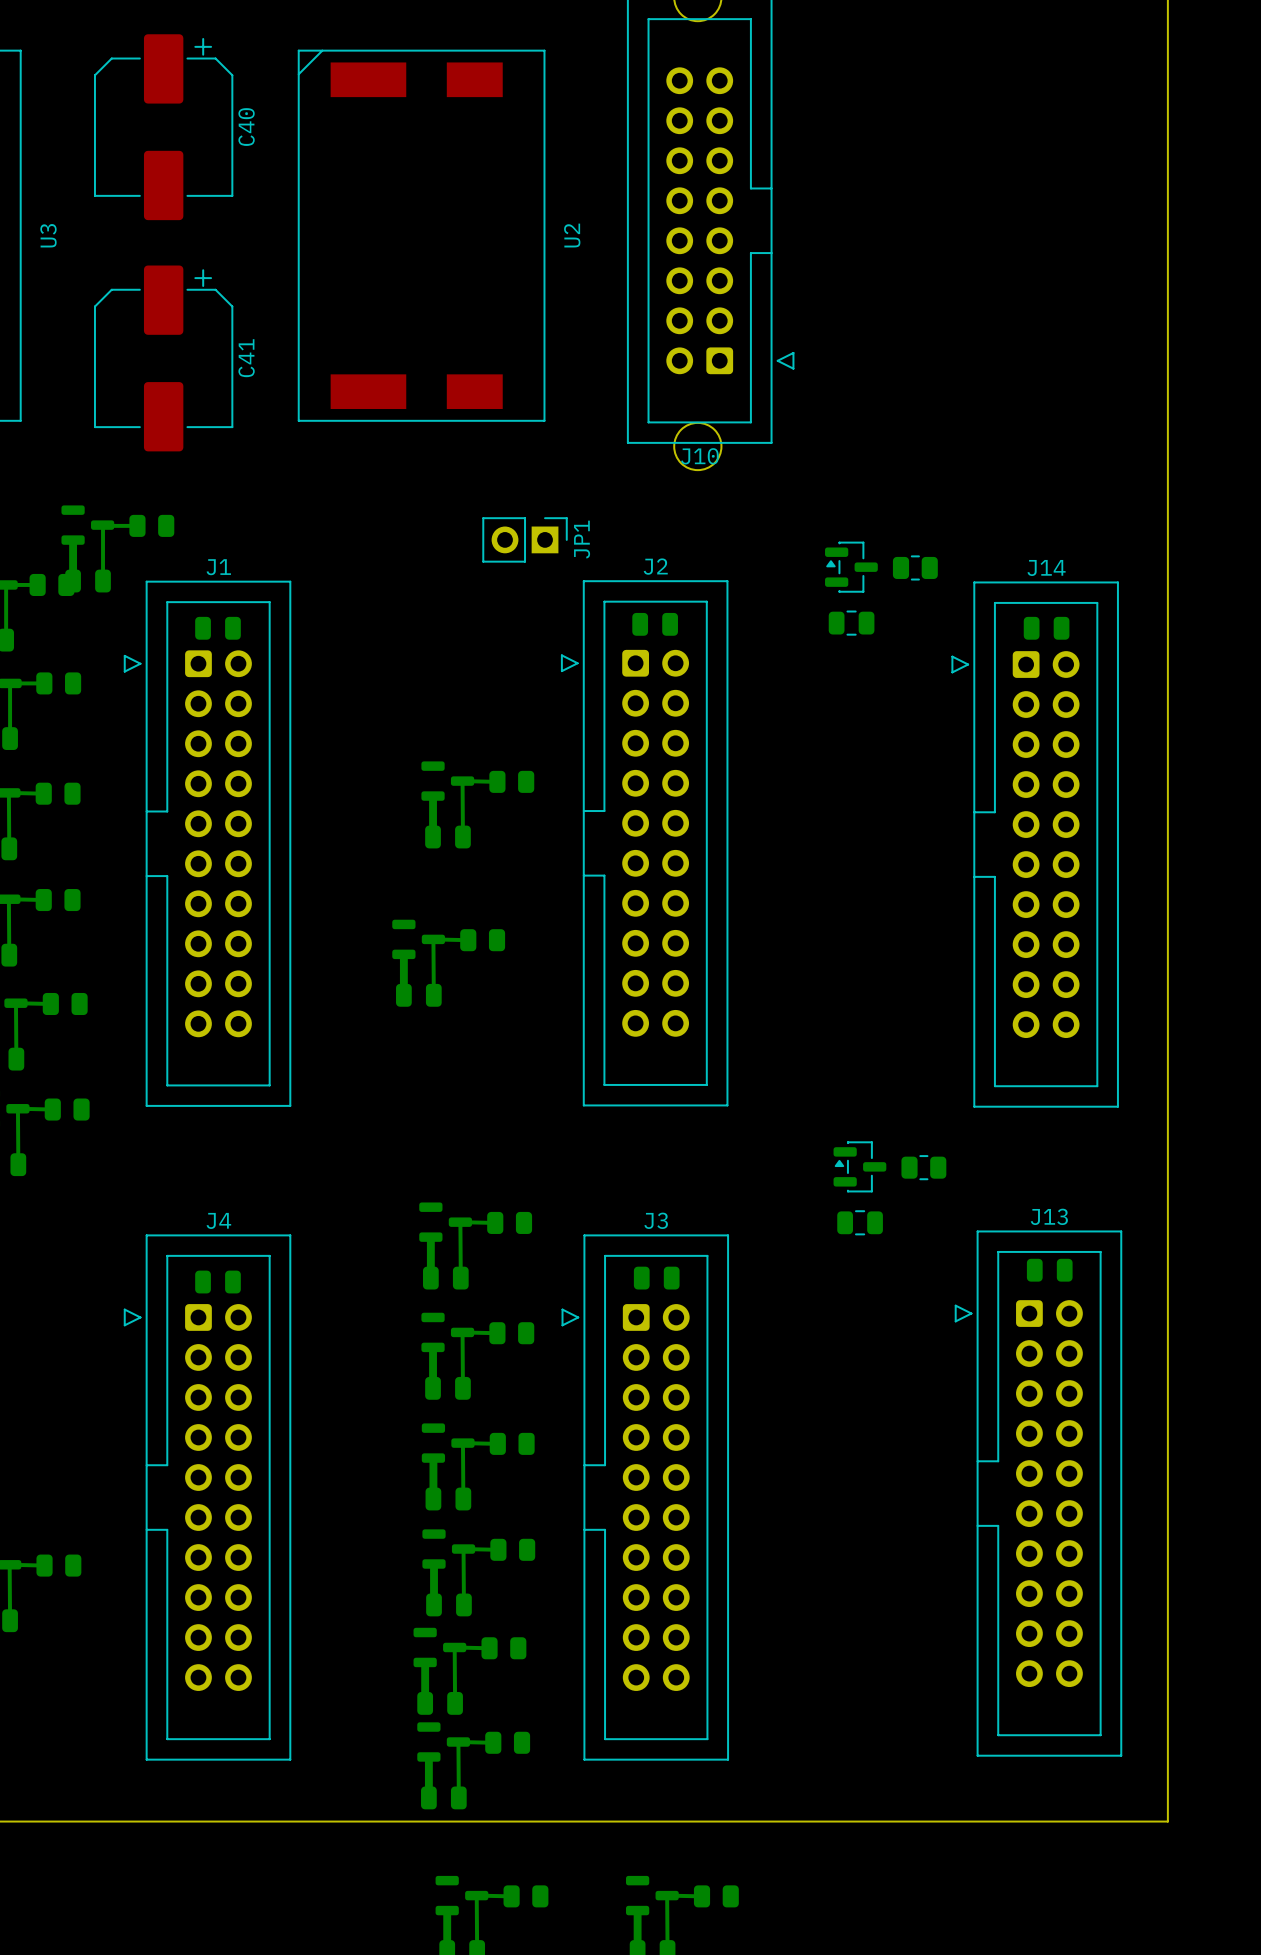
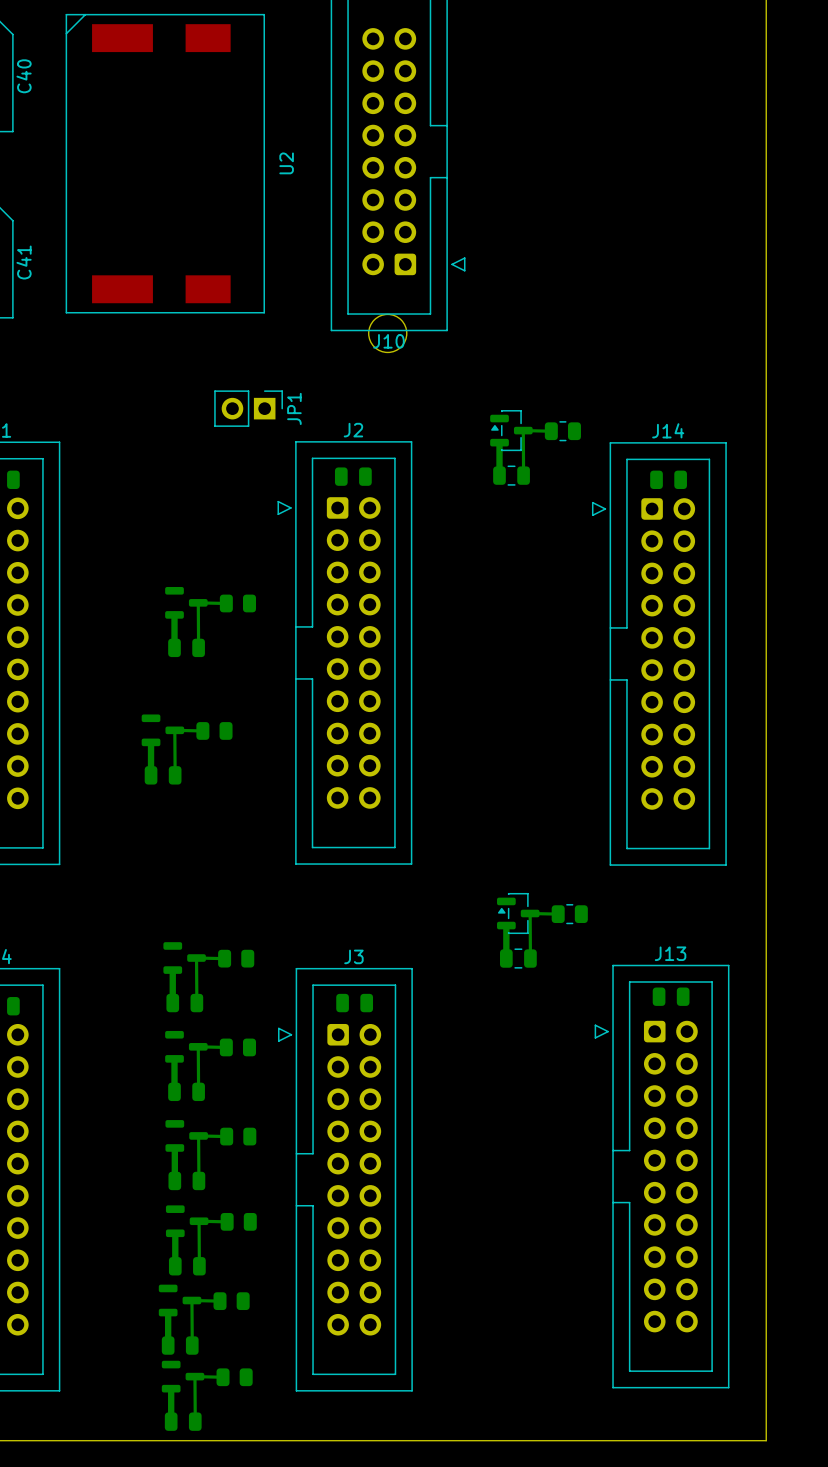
bottom track: none -> (551, 431) (523, 430) (523, 475)
bottom track: none -> (499, 442) (499, 475)
bottom track: none -> (558, 914) (530, 913) (530, 958)
bottom track: none -> (506, 925) (506, 958)

